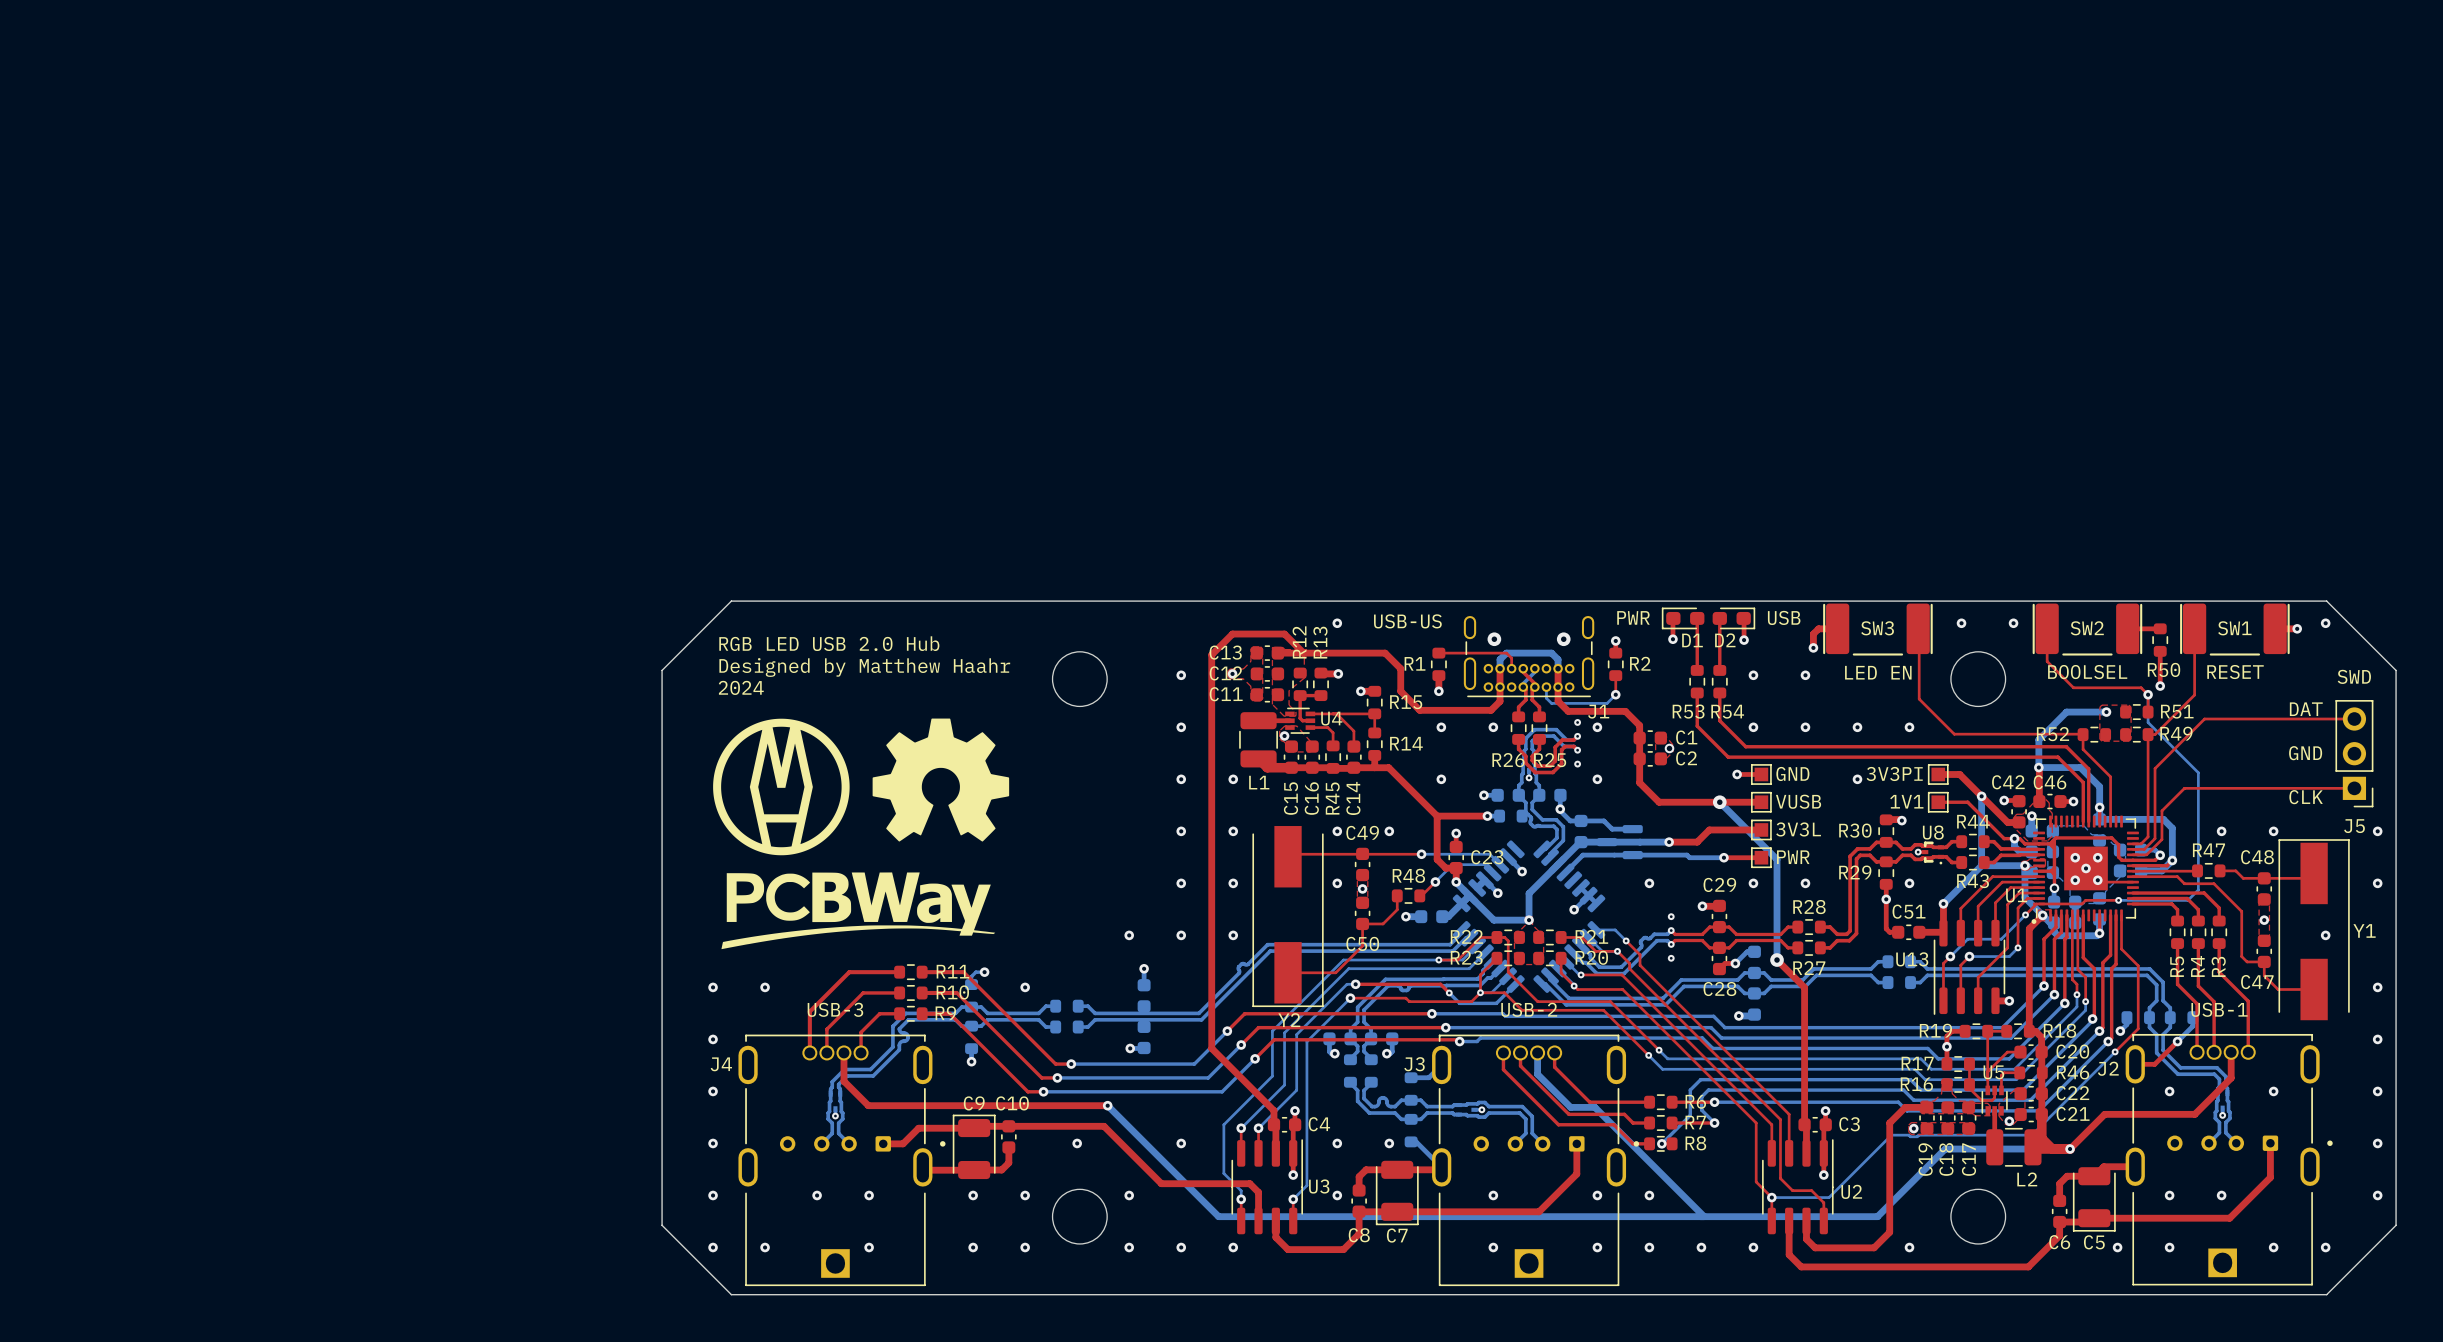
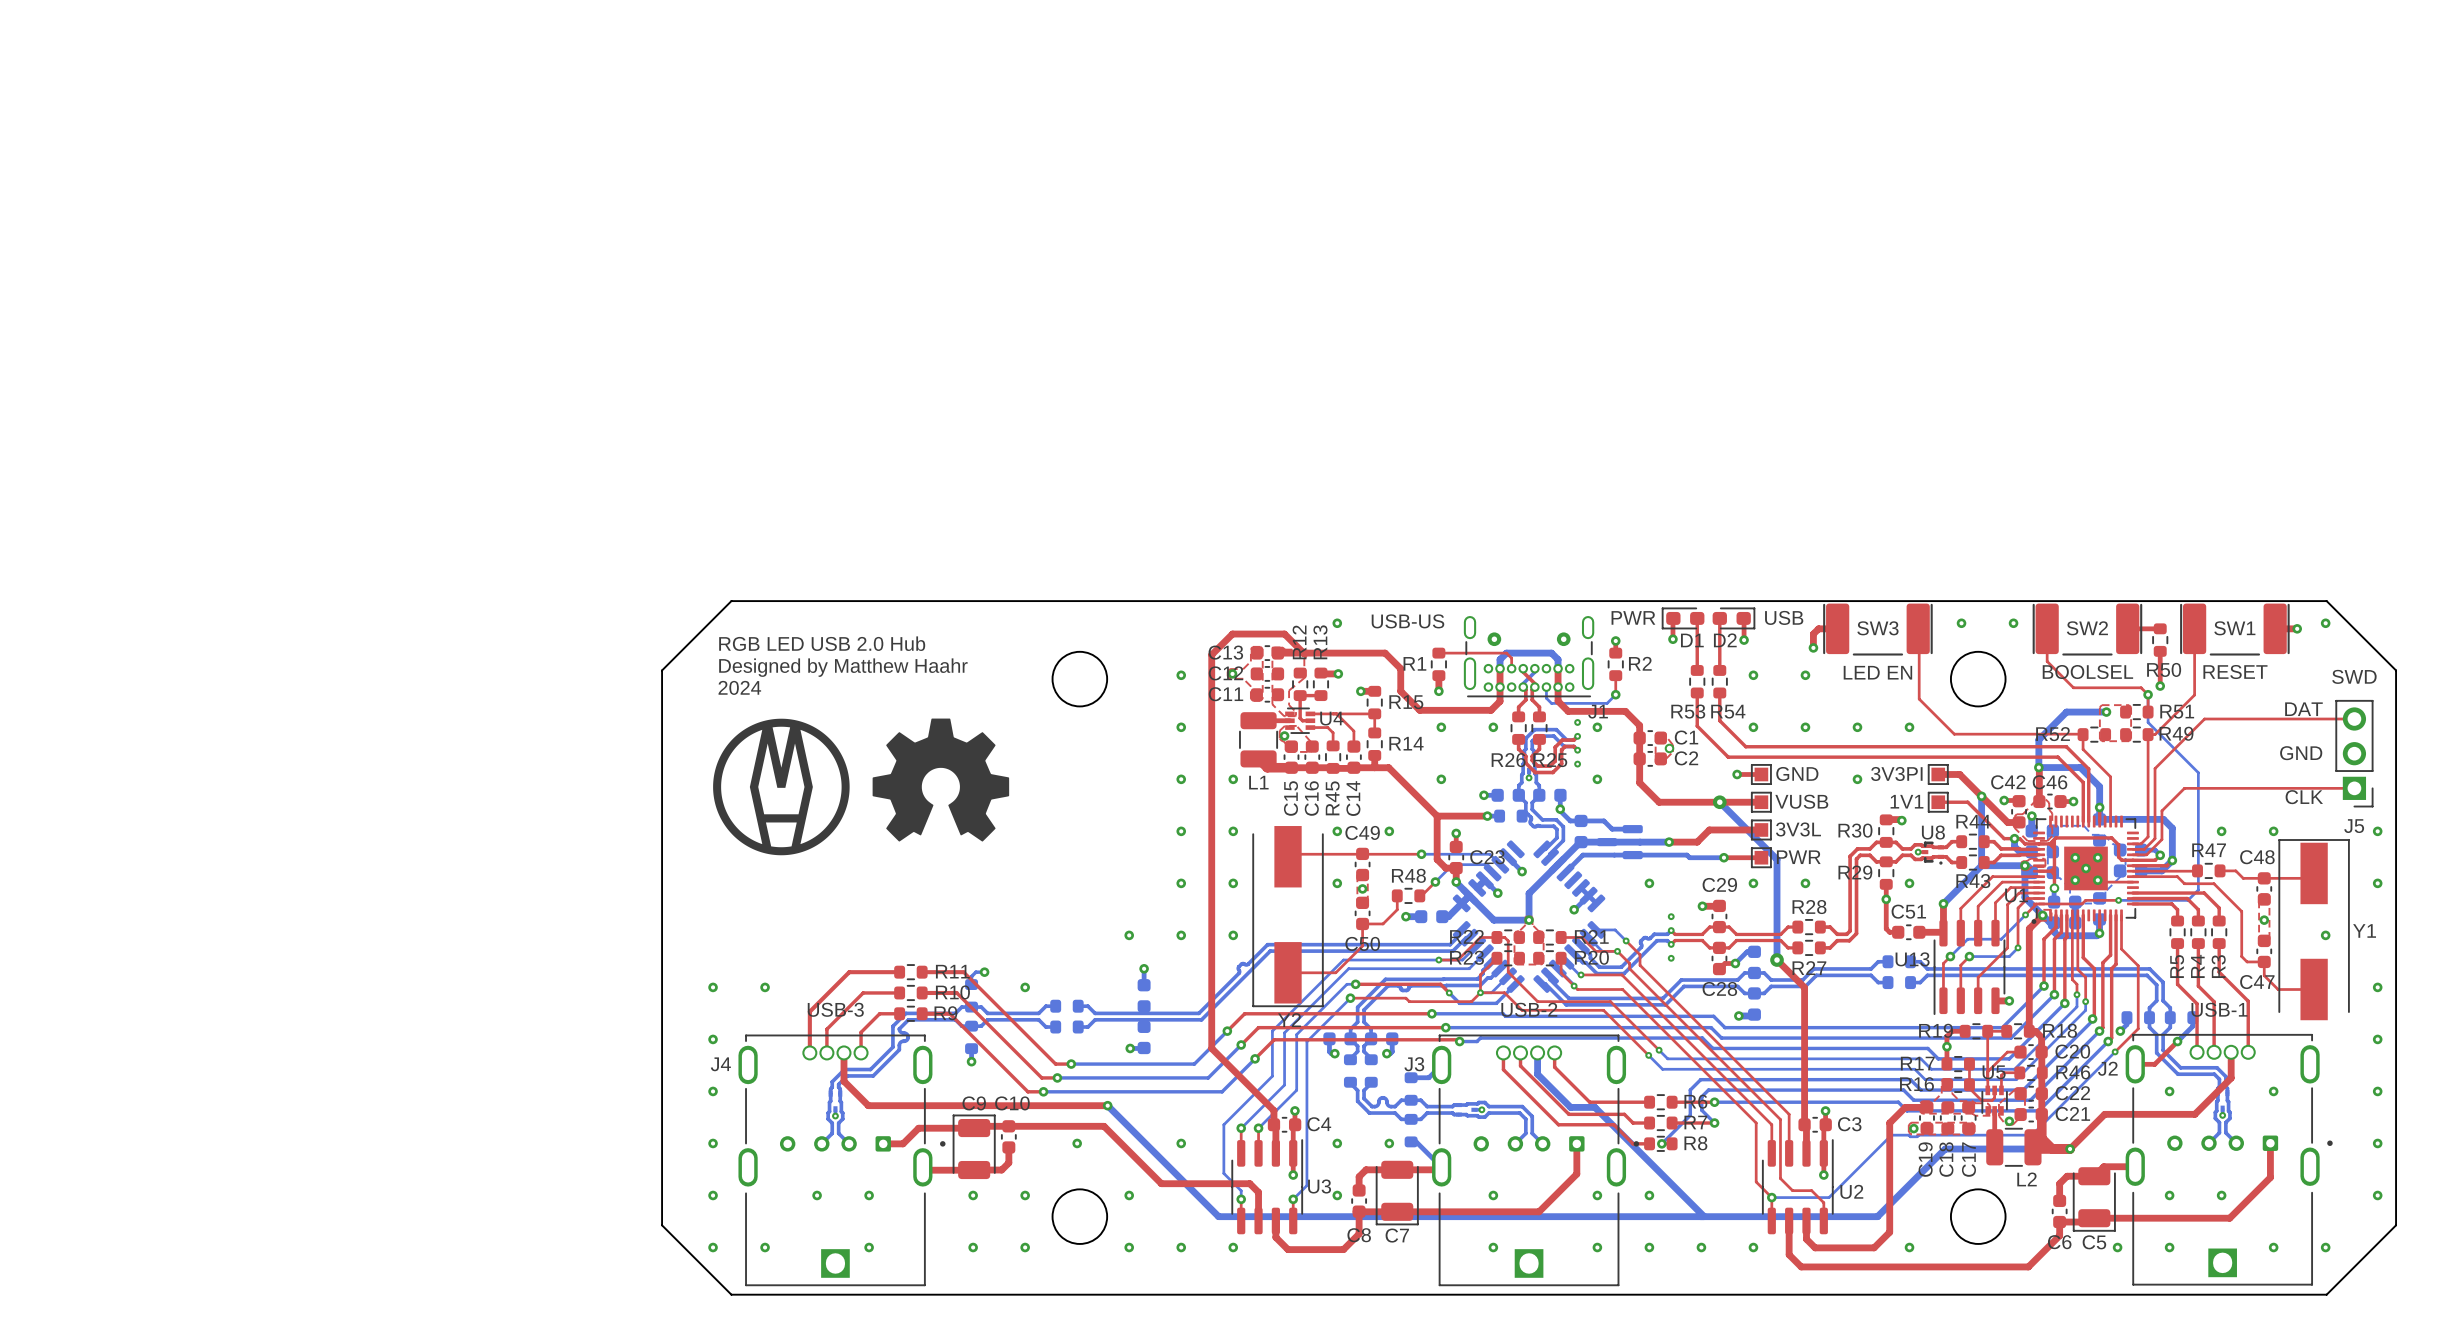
drawing: [721, 872, 996, 950] -> none

